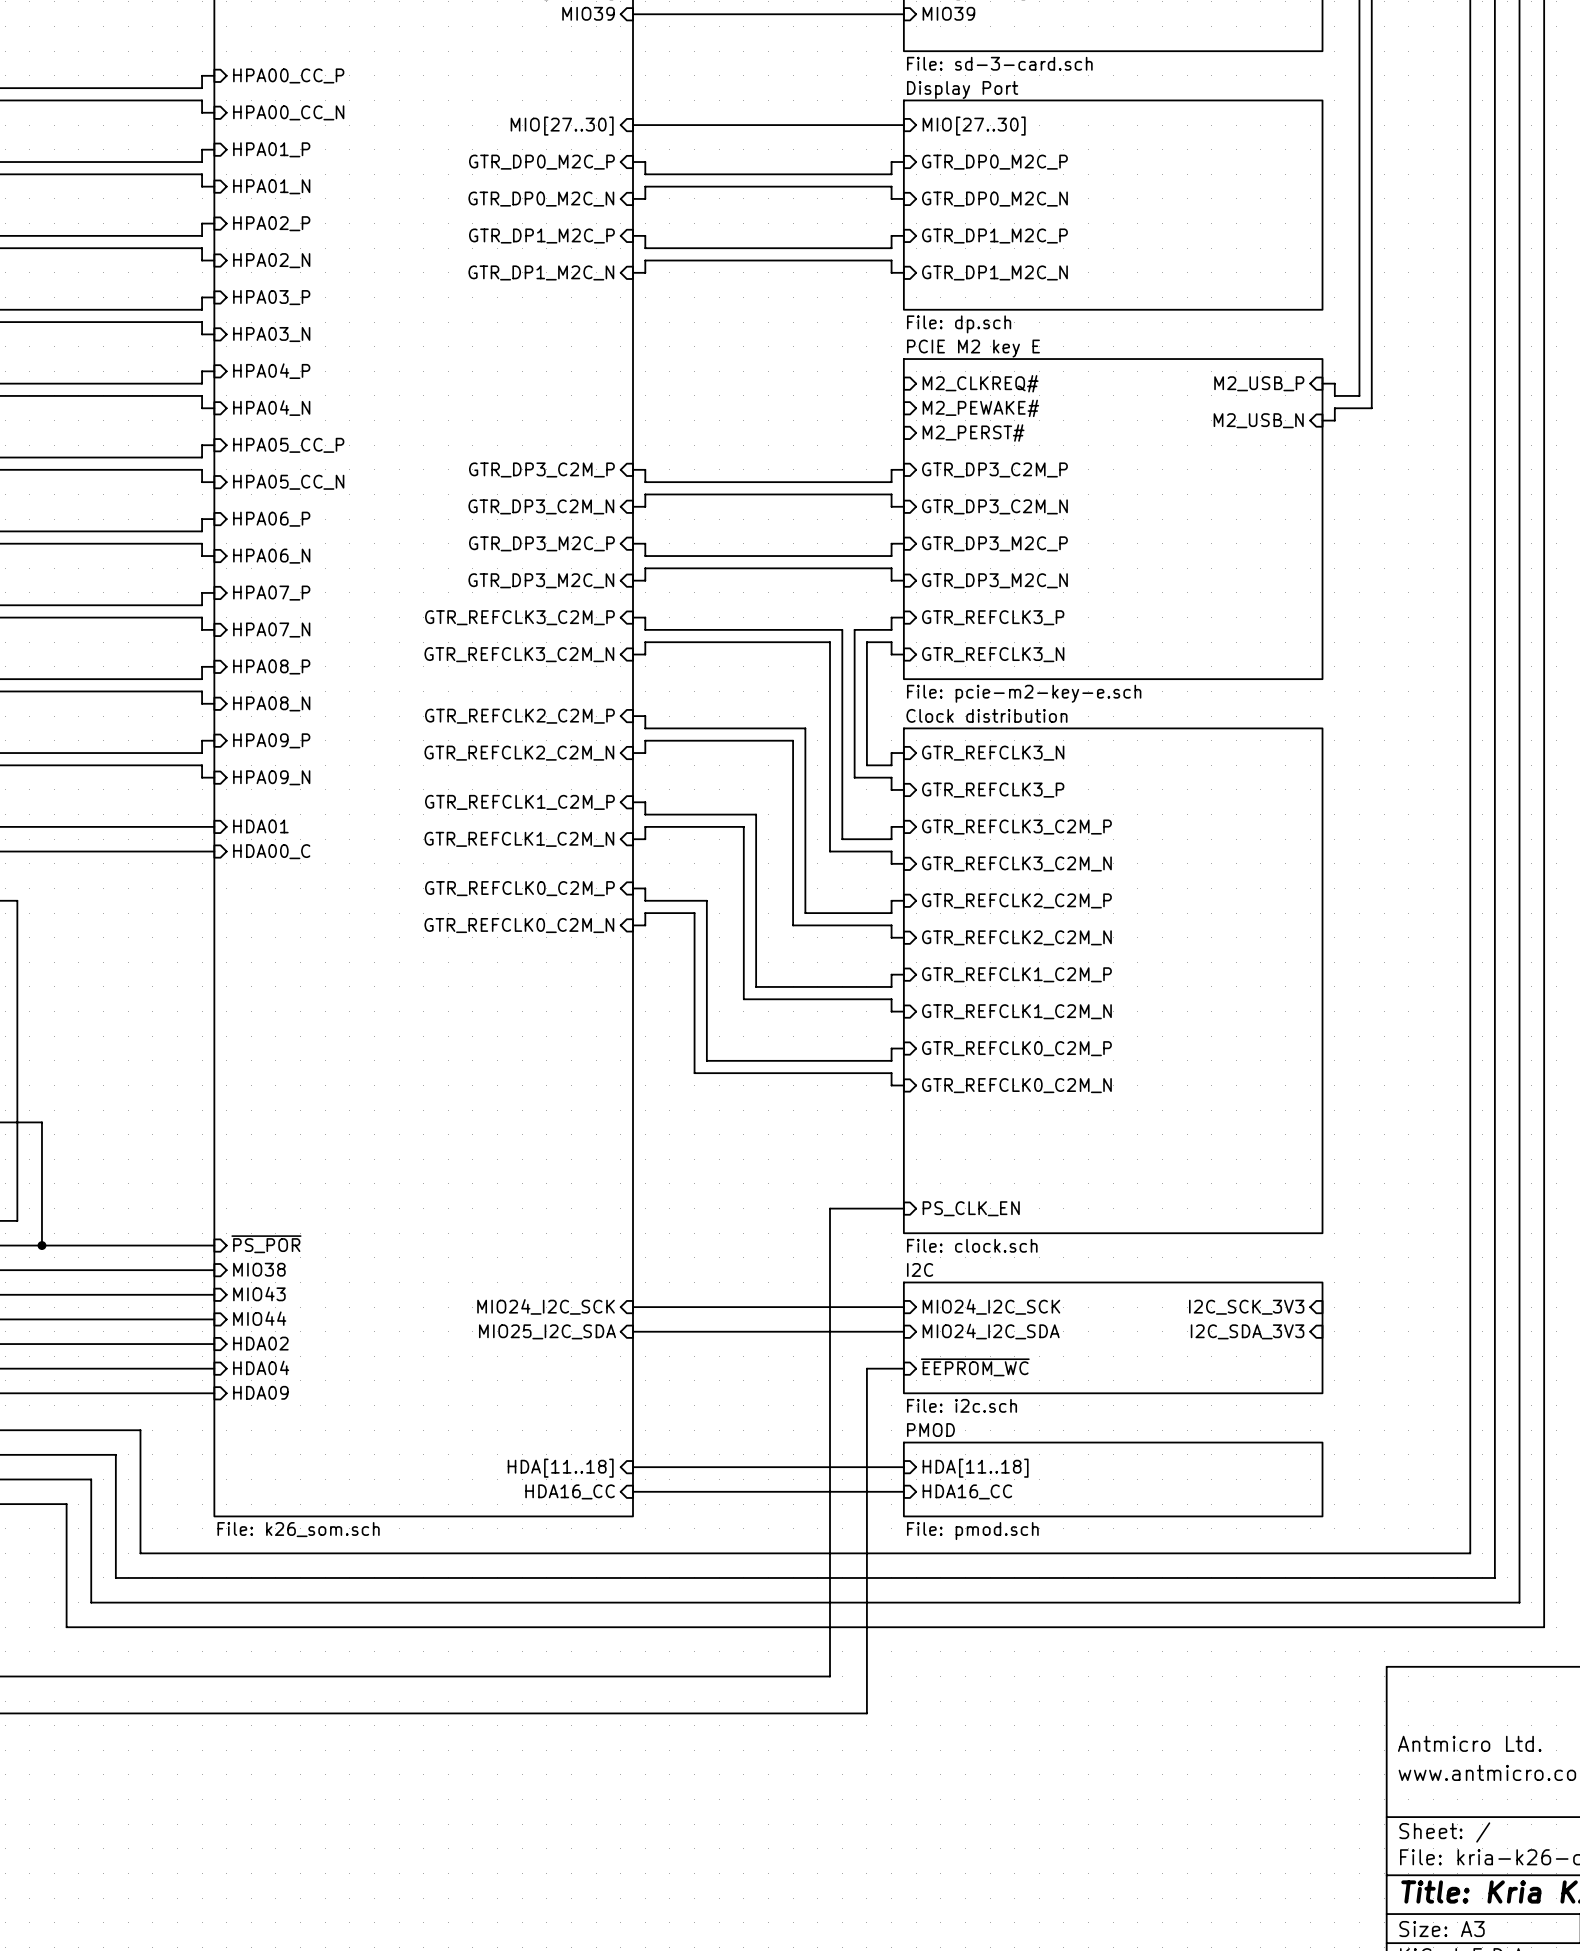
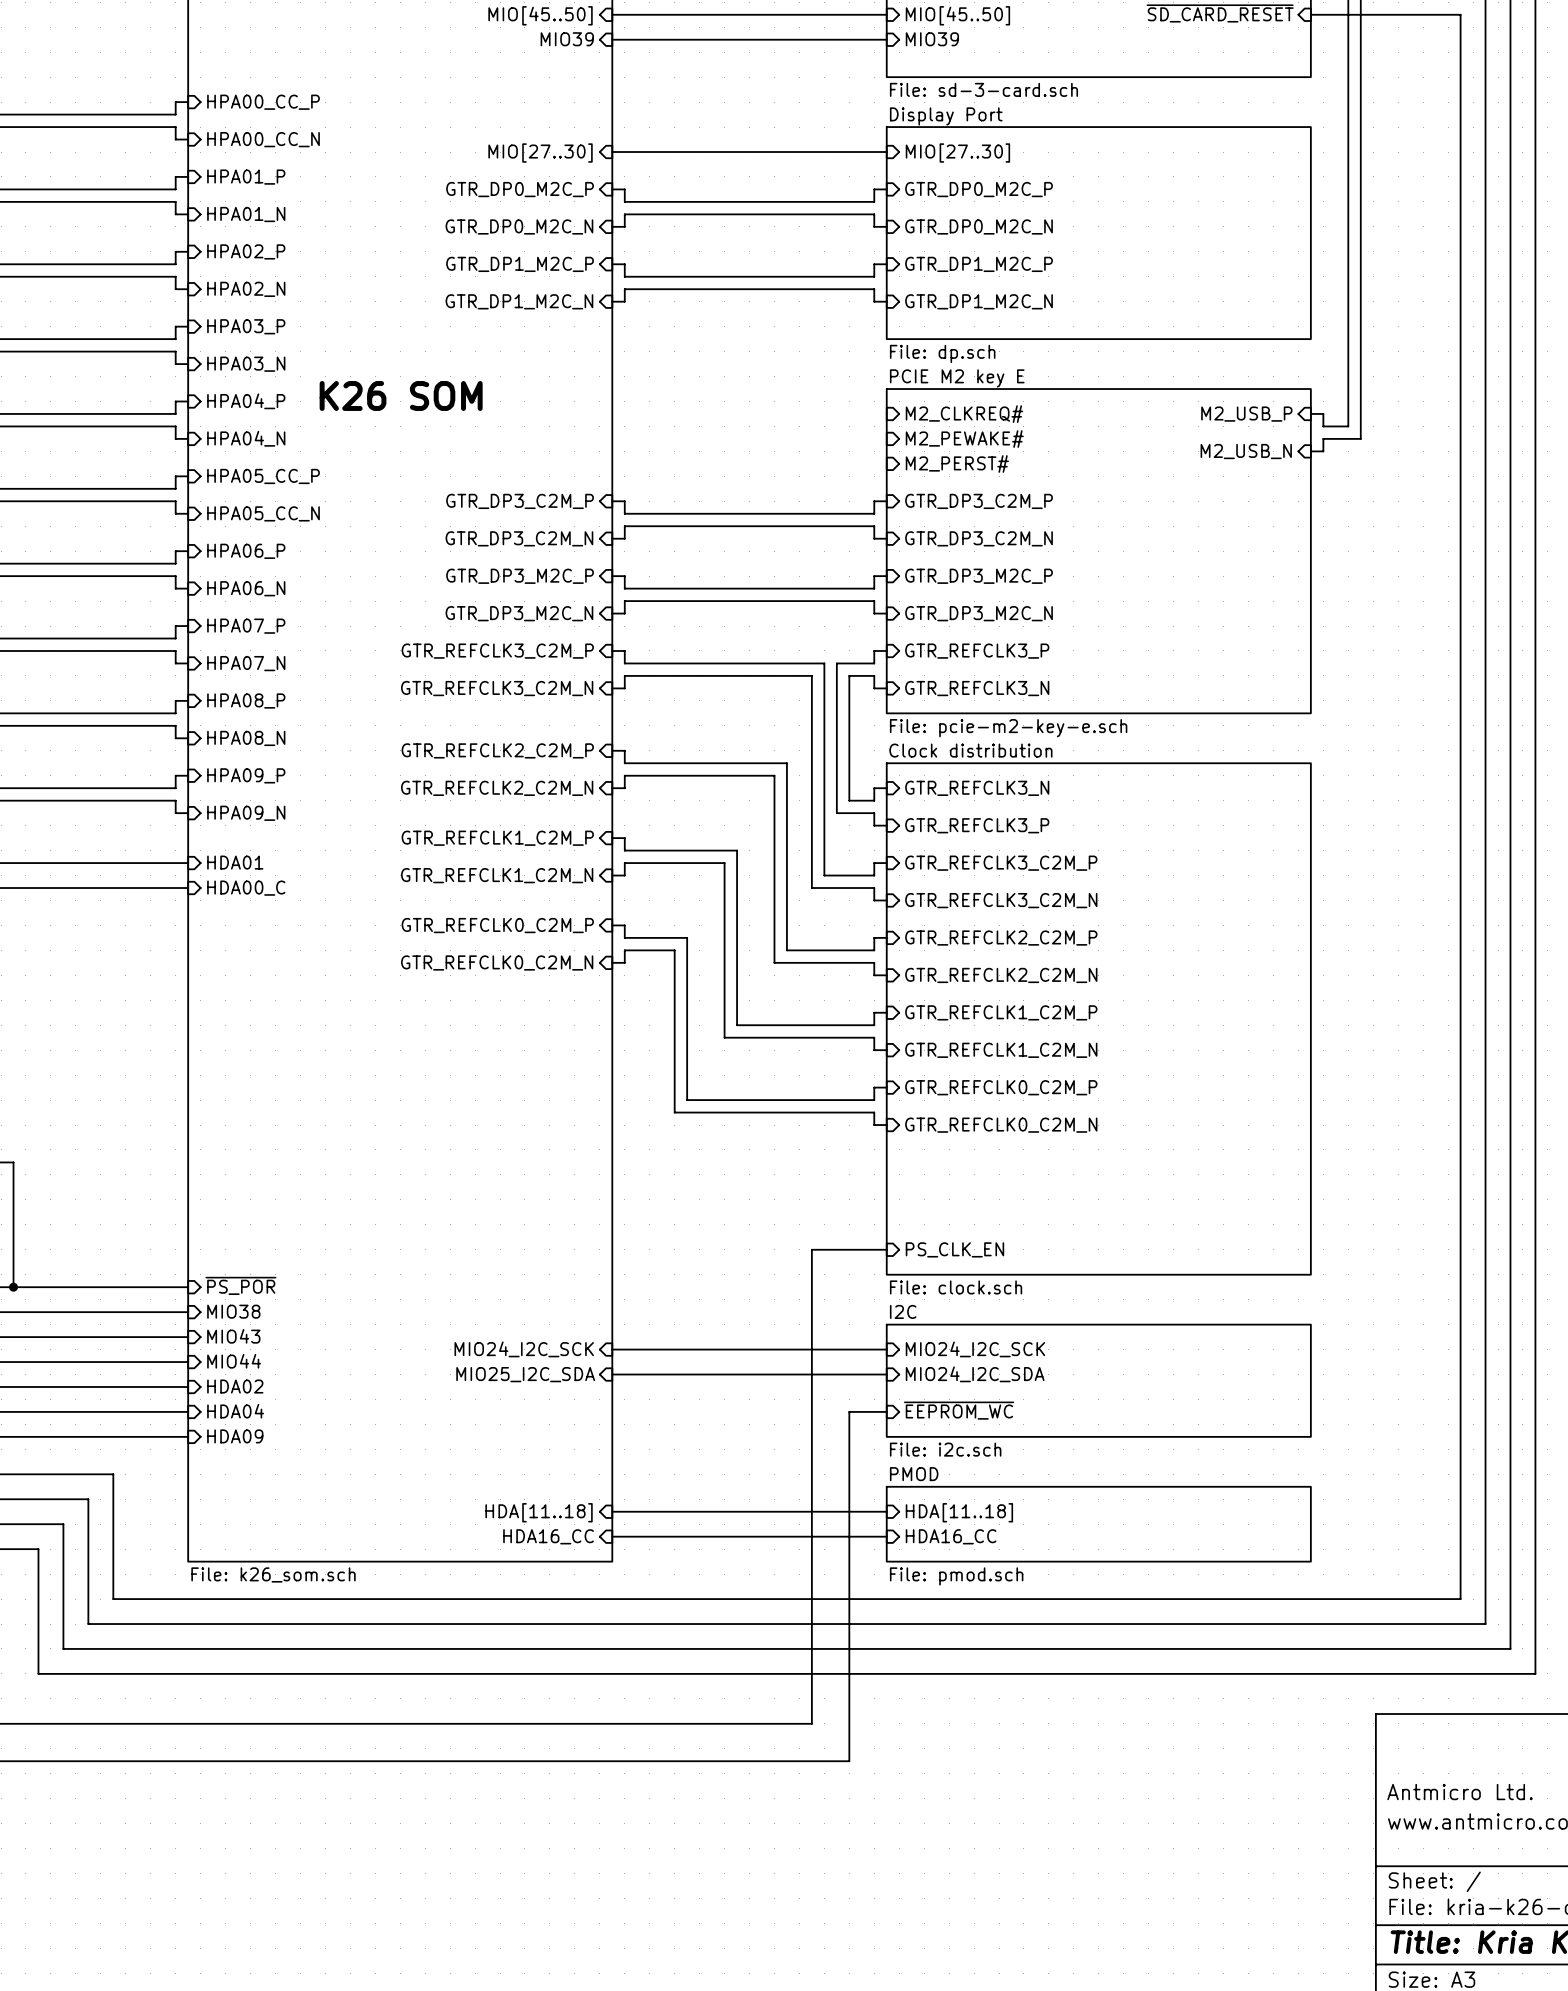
text: none -> K26 SOM (401, 395)
sheet pin: I2C_SCK_3V3 (1246, 1307) -> none
sheet pin: I2C_SDA_3V3 (1247, 1331) -> none

